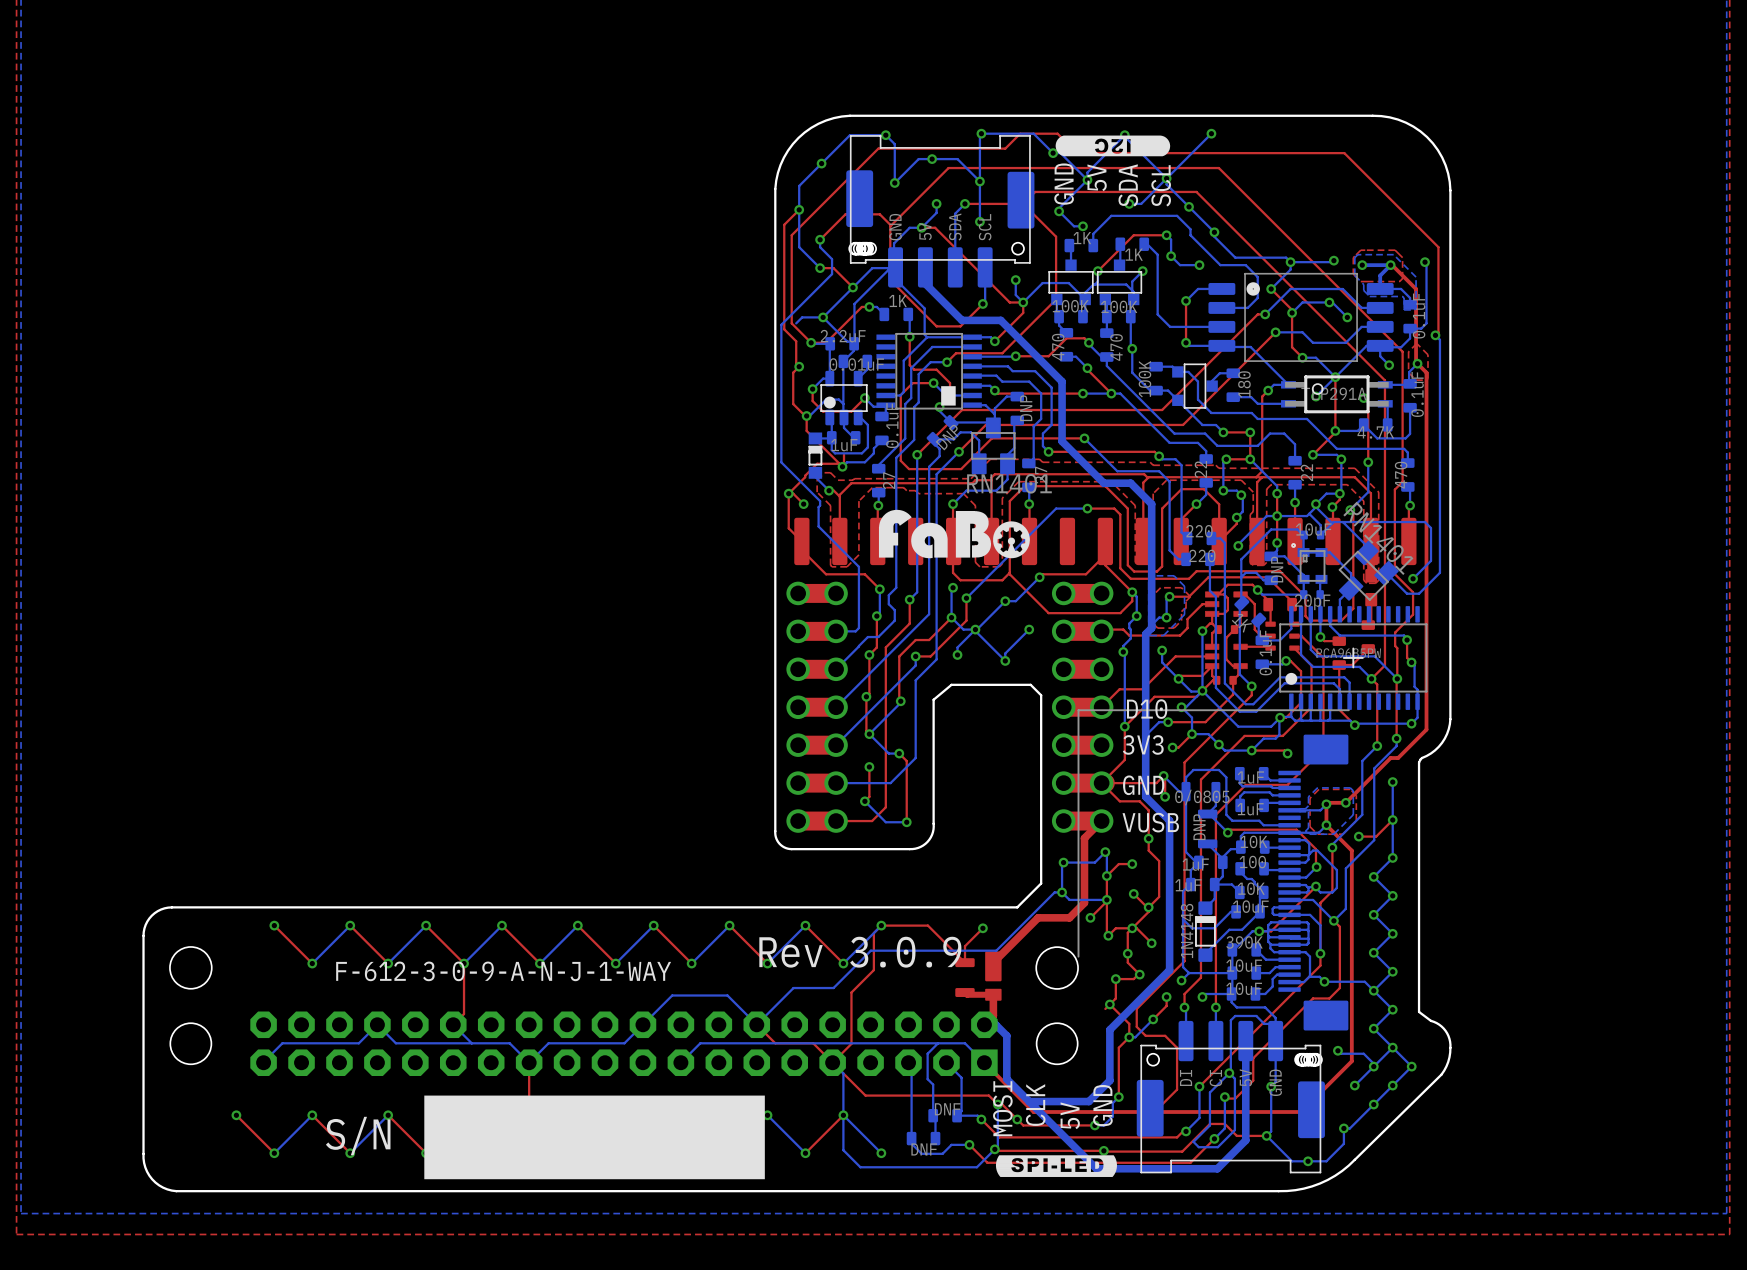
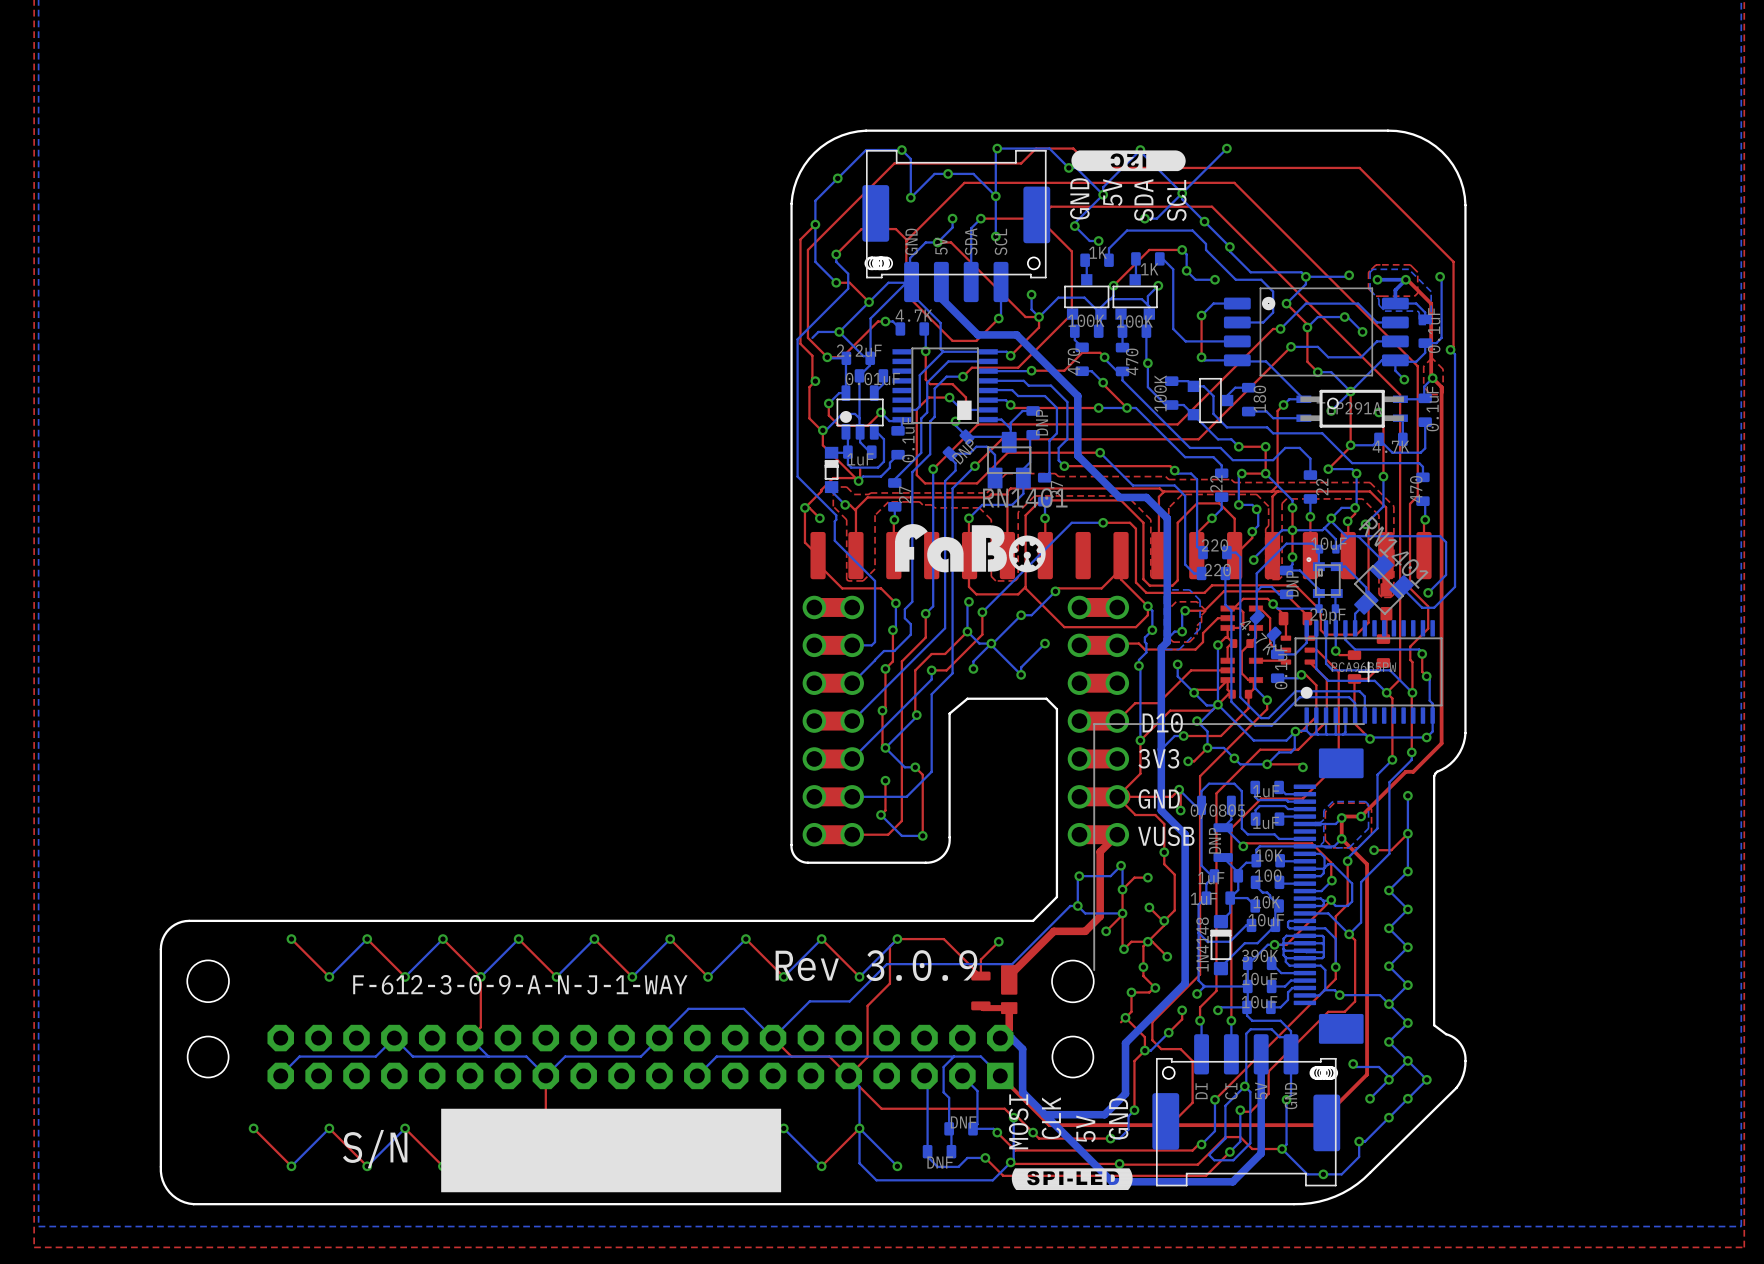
part value: 1K (898, 300) -> 4.7K (913, 315)
part value: 1K (1242, 623) -> 4.７K (1258, 637)

